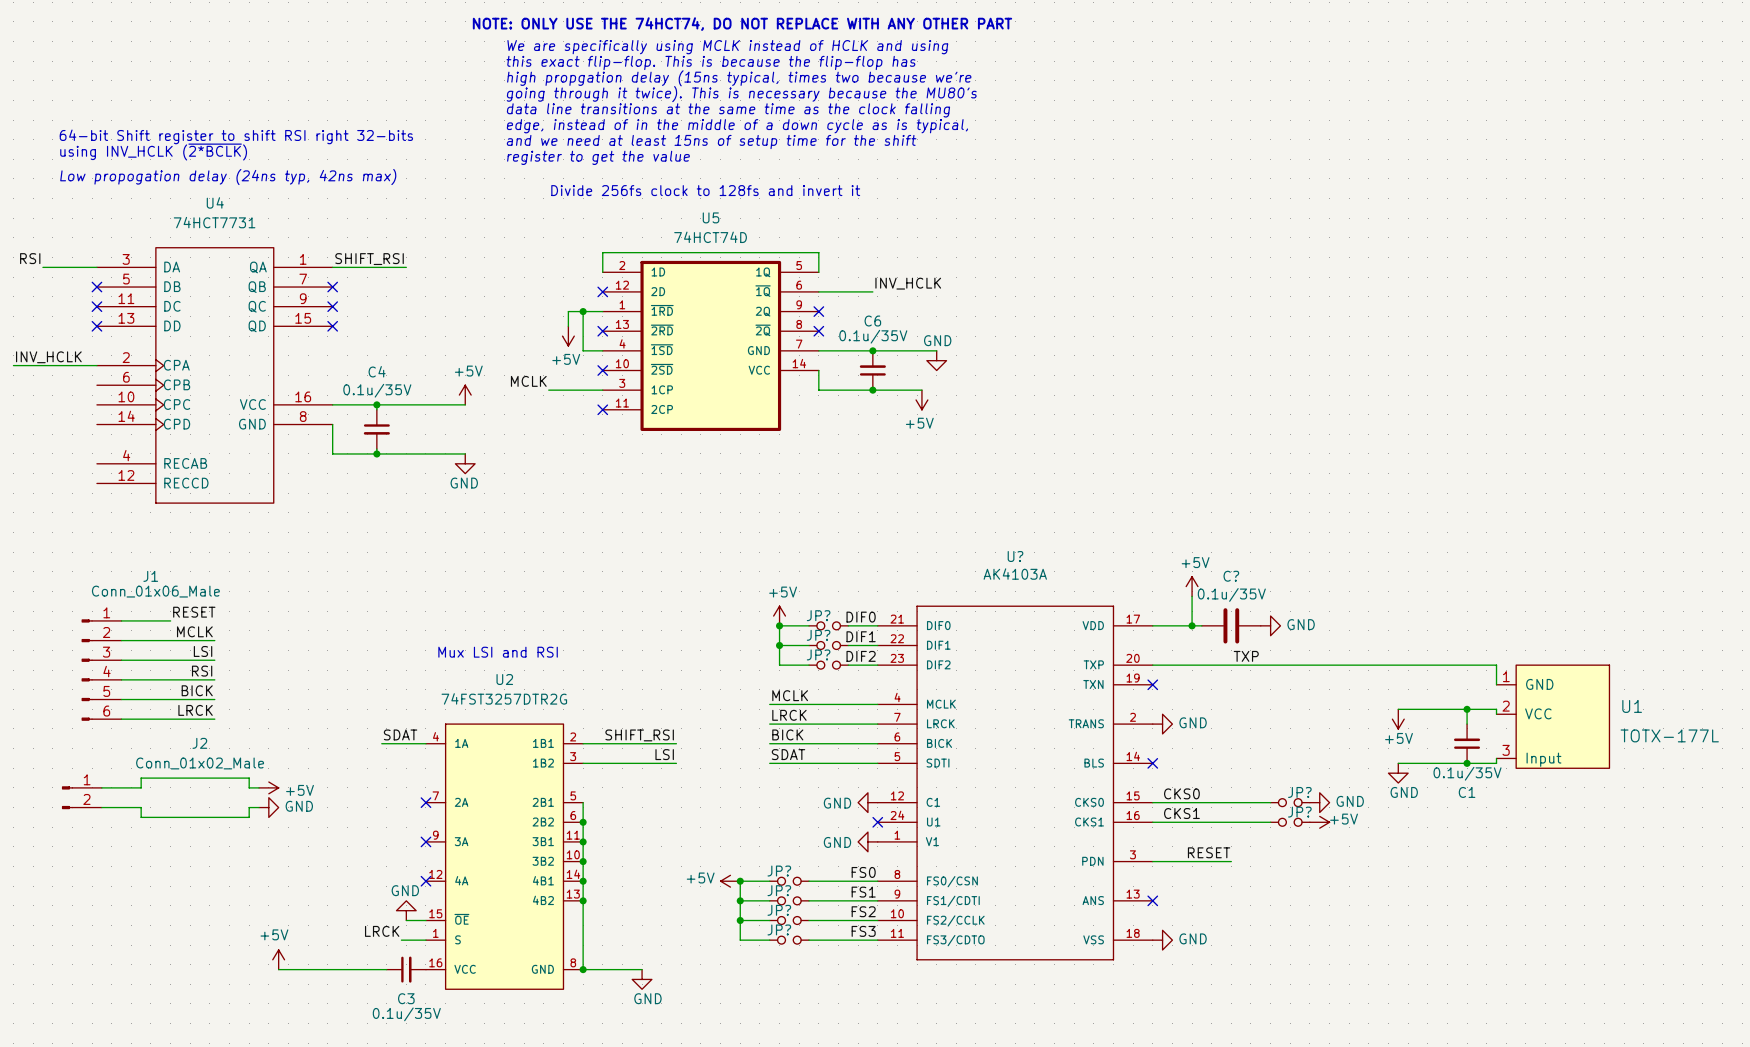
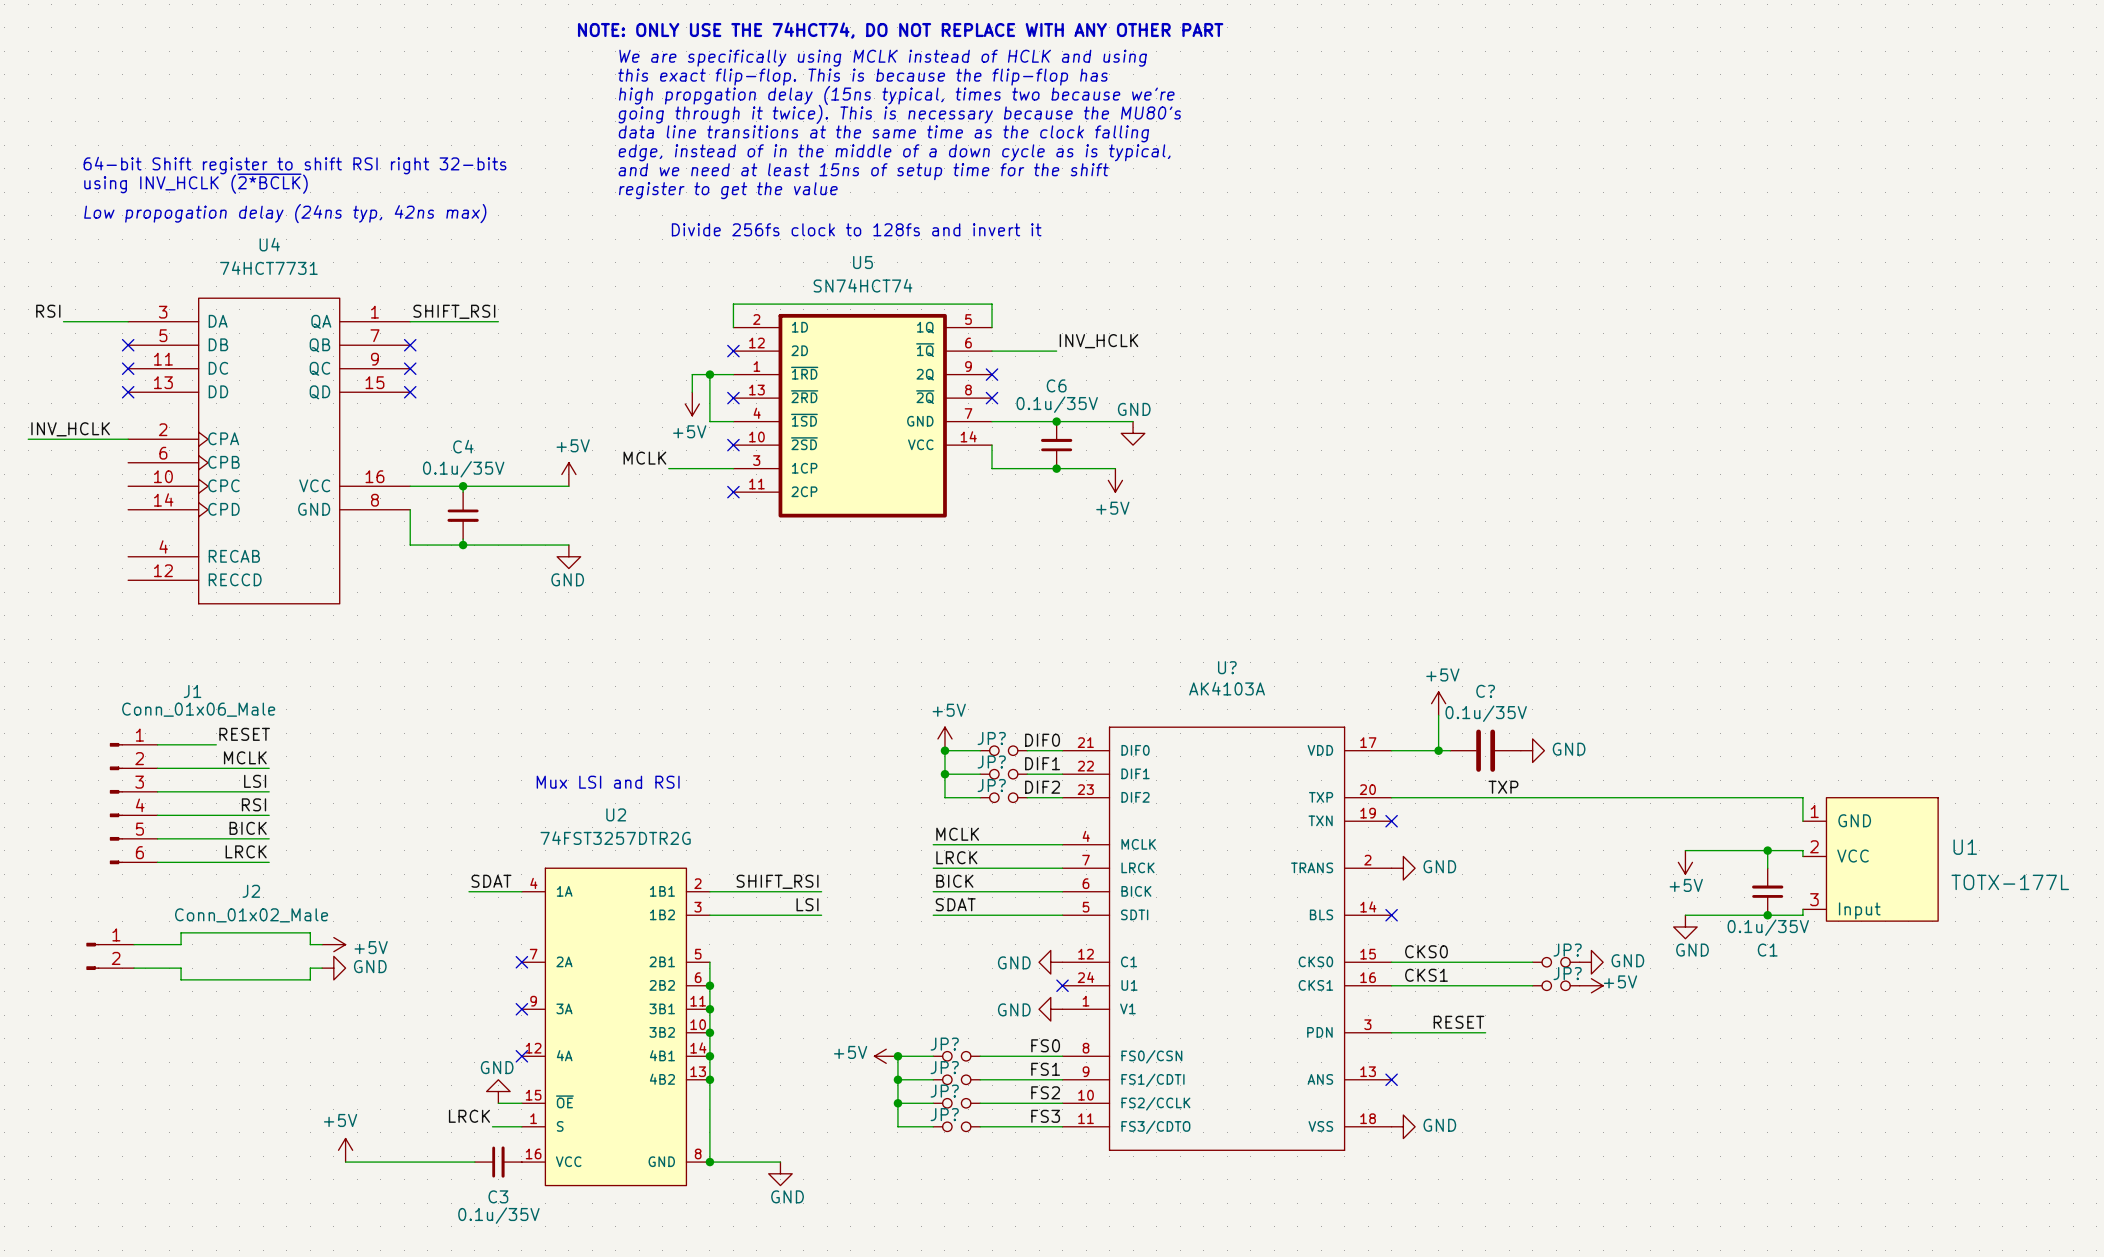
U5 value: 74HCT74D (710, 237) -> SN74HCT74 (862, 285)

